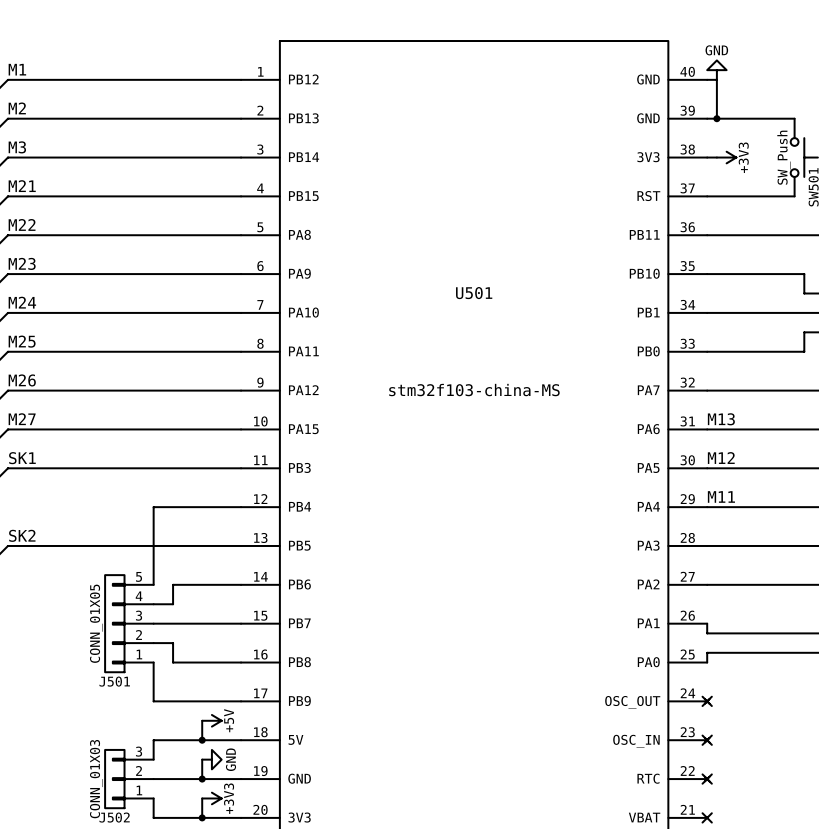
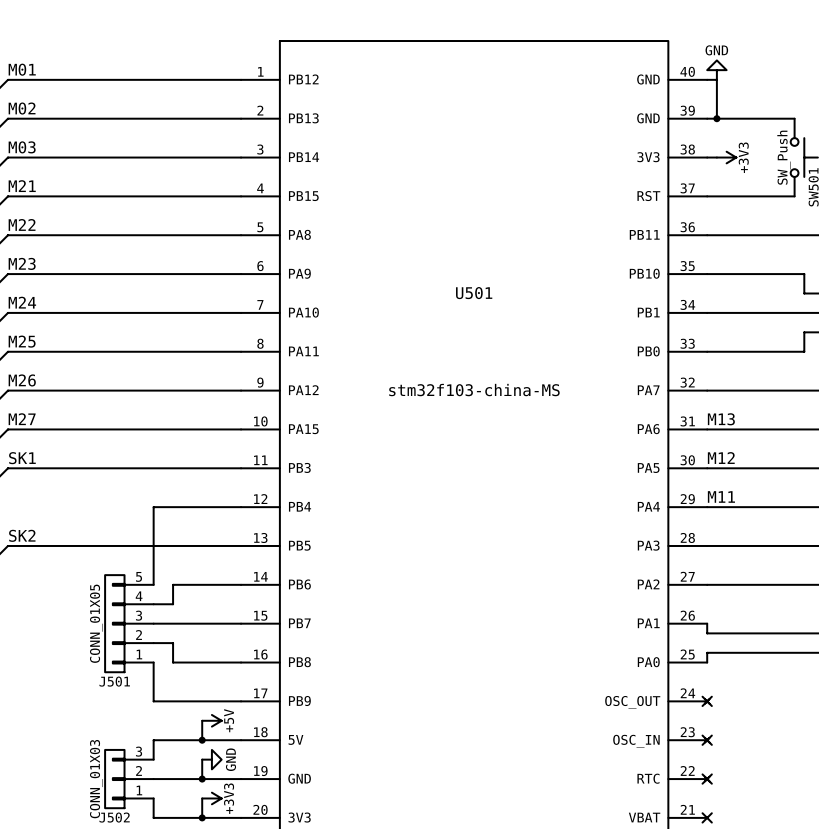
label: M1 (17, 69) -> M01 (22, 69)
label: M2 (17, 108) -> M02 (22, 108)
label: M3 (17, 147) -> M03 (22, 147)

